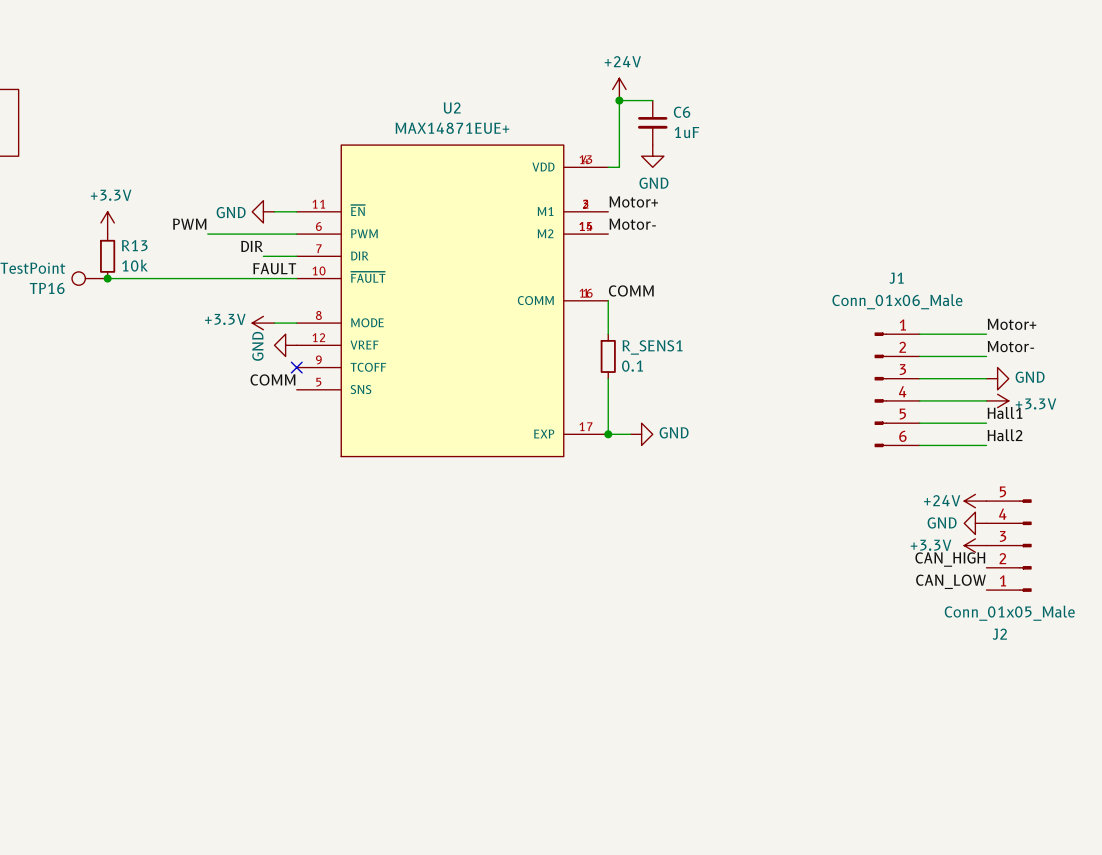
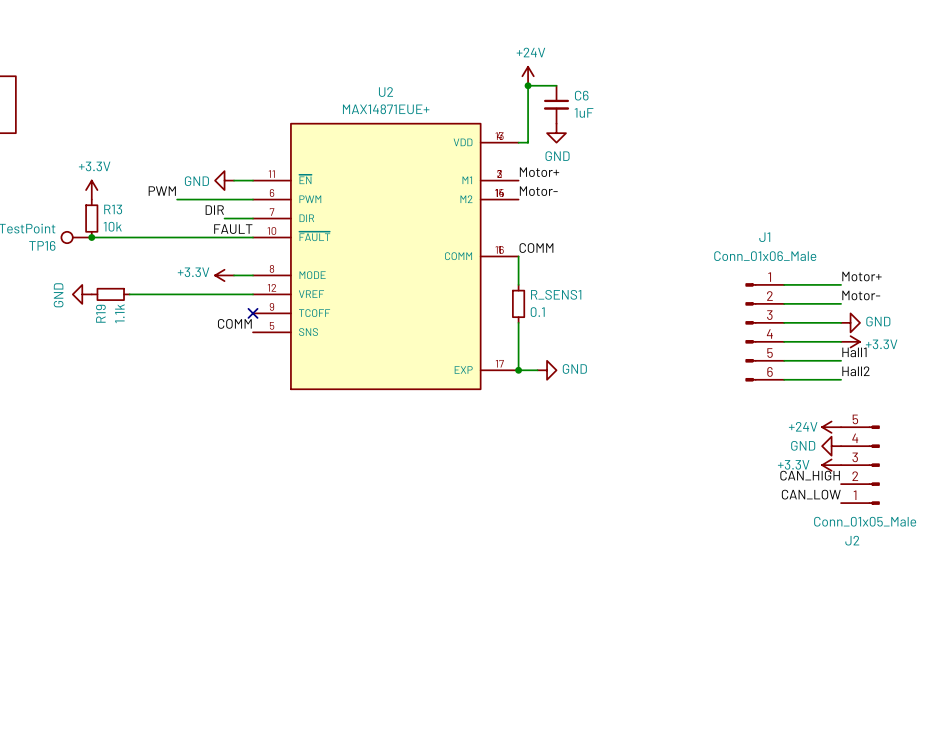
R19: none -> 1.1k (110, 294)
wire: none -> (129, 294) (253, 294)
power symbol position: GND (285, 345) -> GND (82, 294)

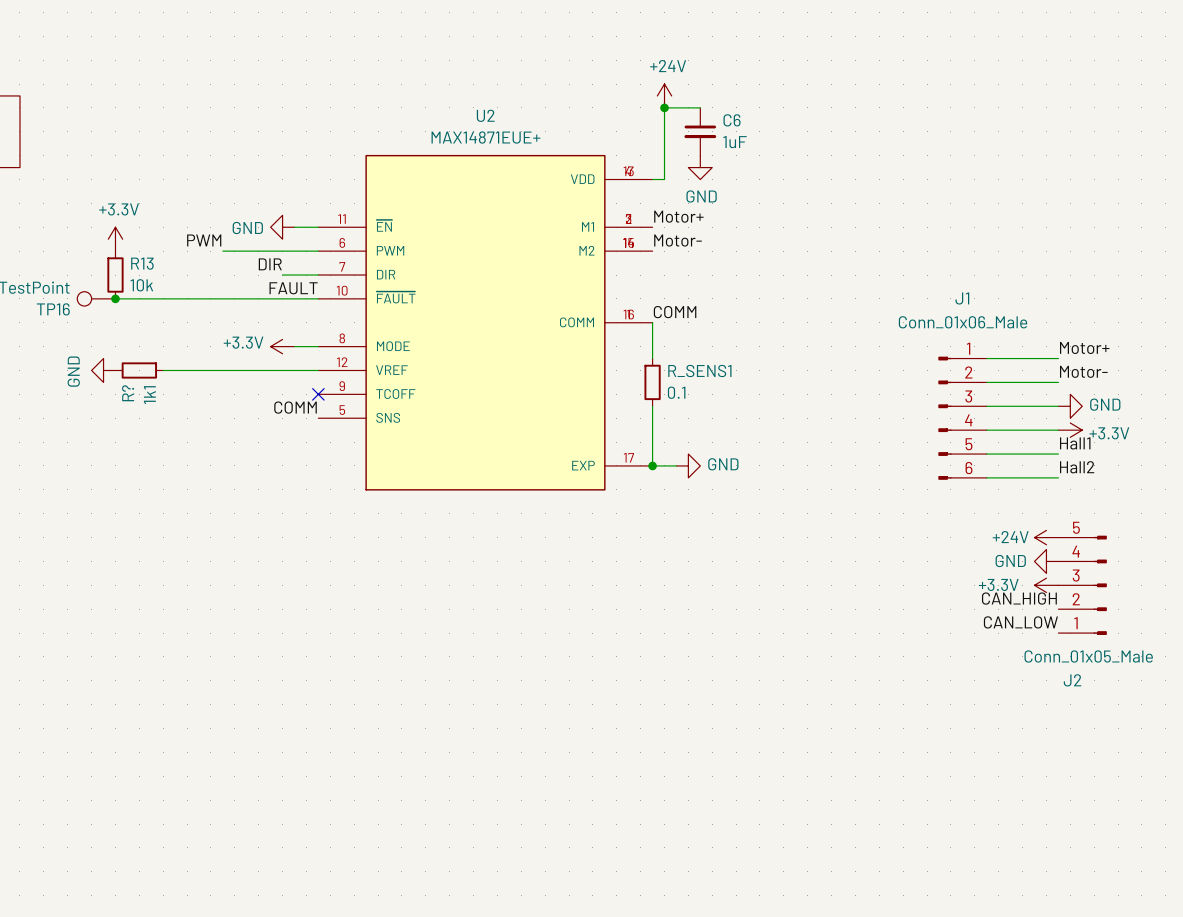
R19 name: R19 (100, 313) -> 1k1 (149, 395)
R19 value: 1.1k (119, 313) -> R? (128, 393)

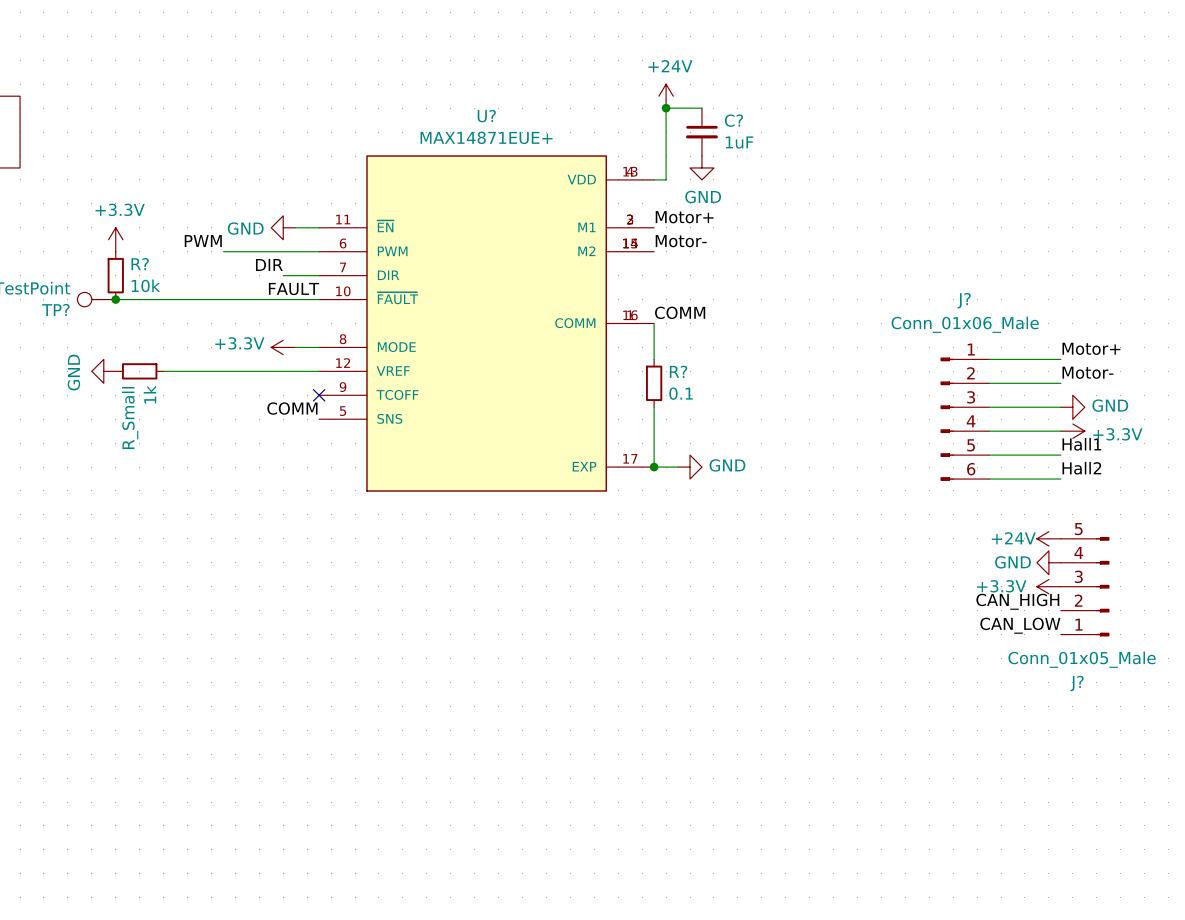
U2 name: U2 (485, 115) -> U? (486, 116)
C6 name: C6 (732, 120) -> C? (733, 120)
R13 name: R13 (142, 263) -> R? (140, 264)
J1 name: J1 (962, 298) -> J? (964, 300)
TP16 name: TP16 (53, 309) -> TP? (55, 310)
R_SENS1 name: R_SENS1 (699, 370) -> R? (678, 371)
1k1 value: R? (128, 393) -> R_Small (130, 418)
1k1 name: 1k1 (149, 395) -> 1k (149, 394)
J2 name: J2 (1072, 680) -> J? (1077, 683)

